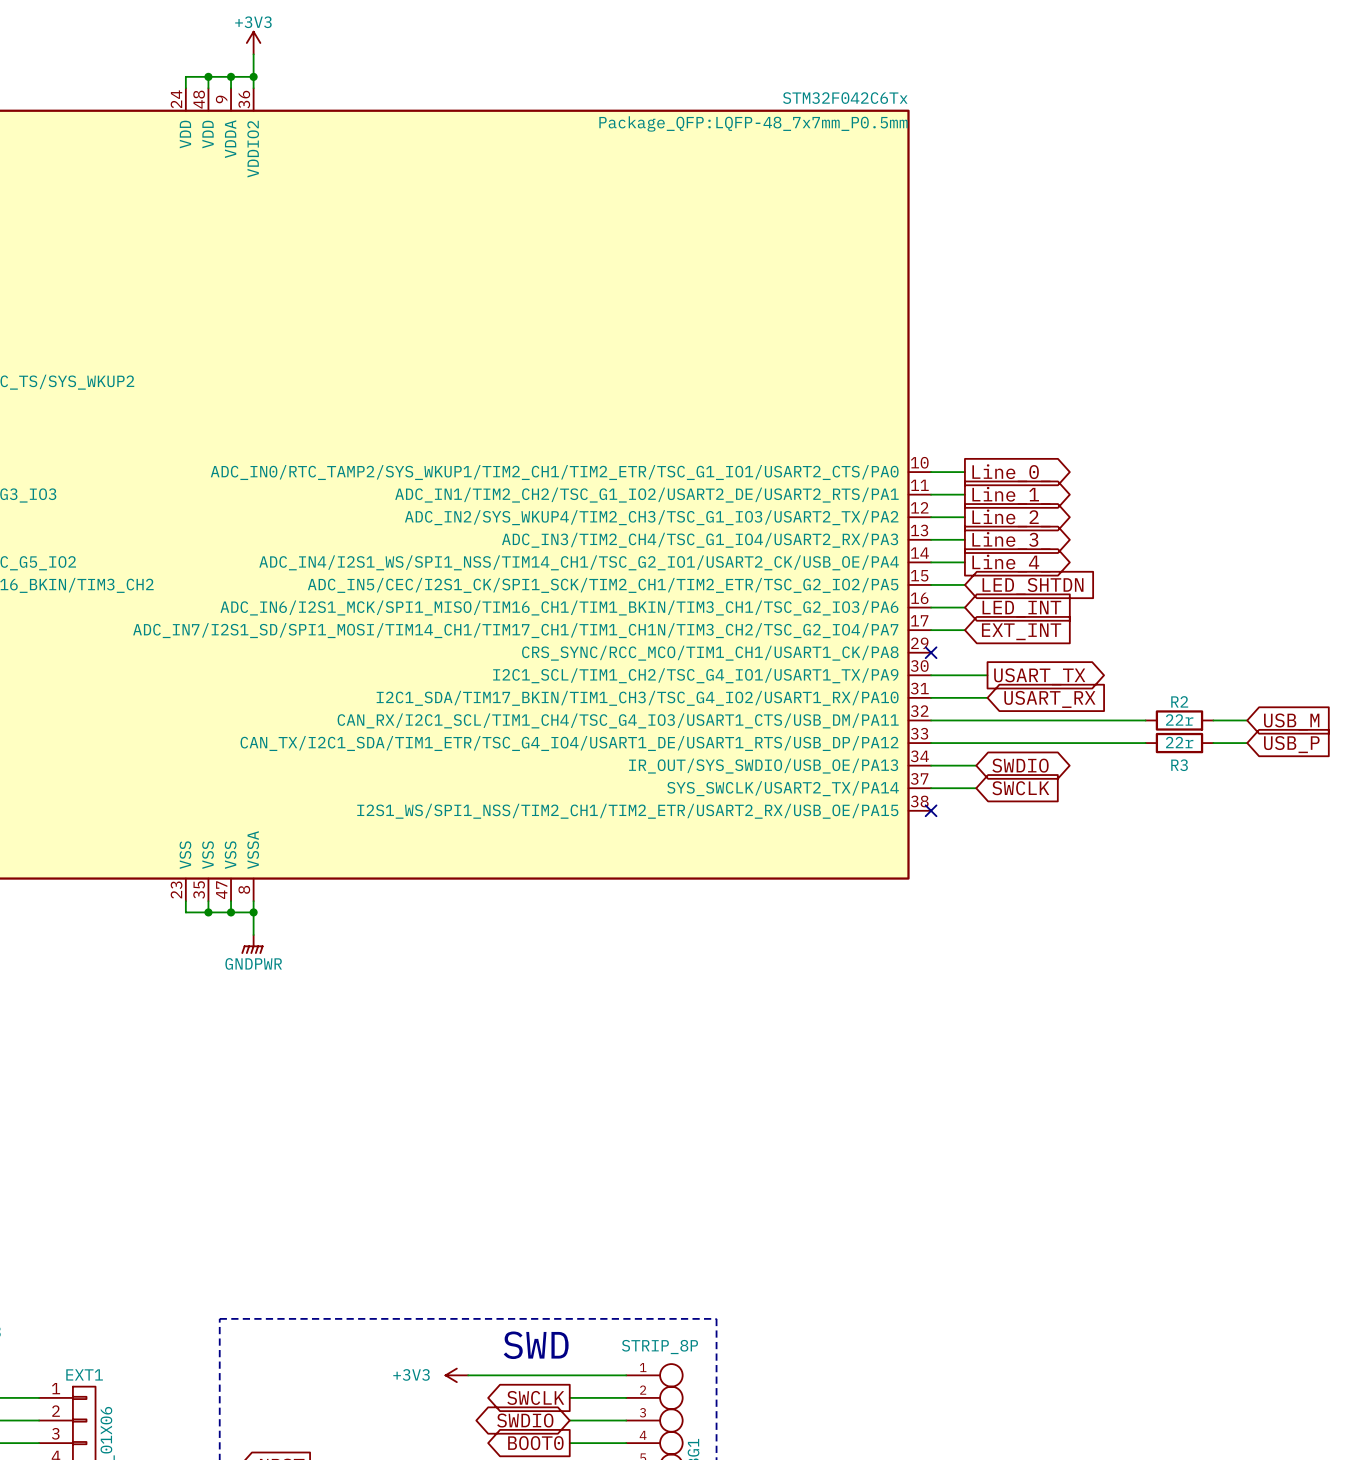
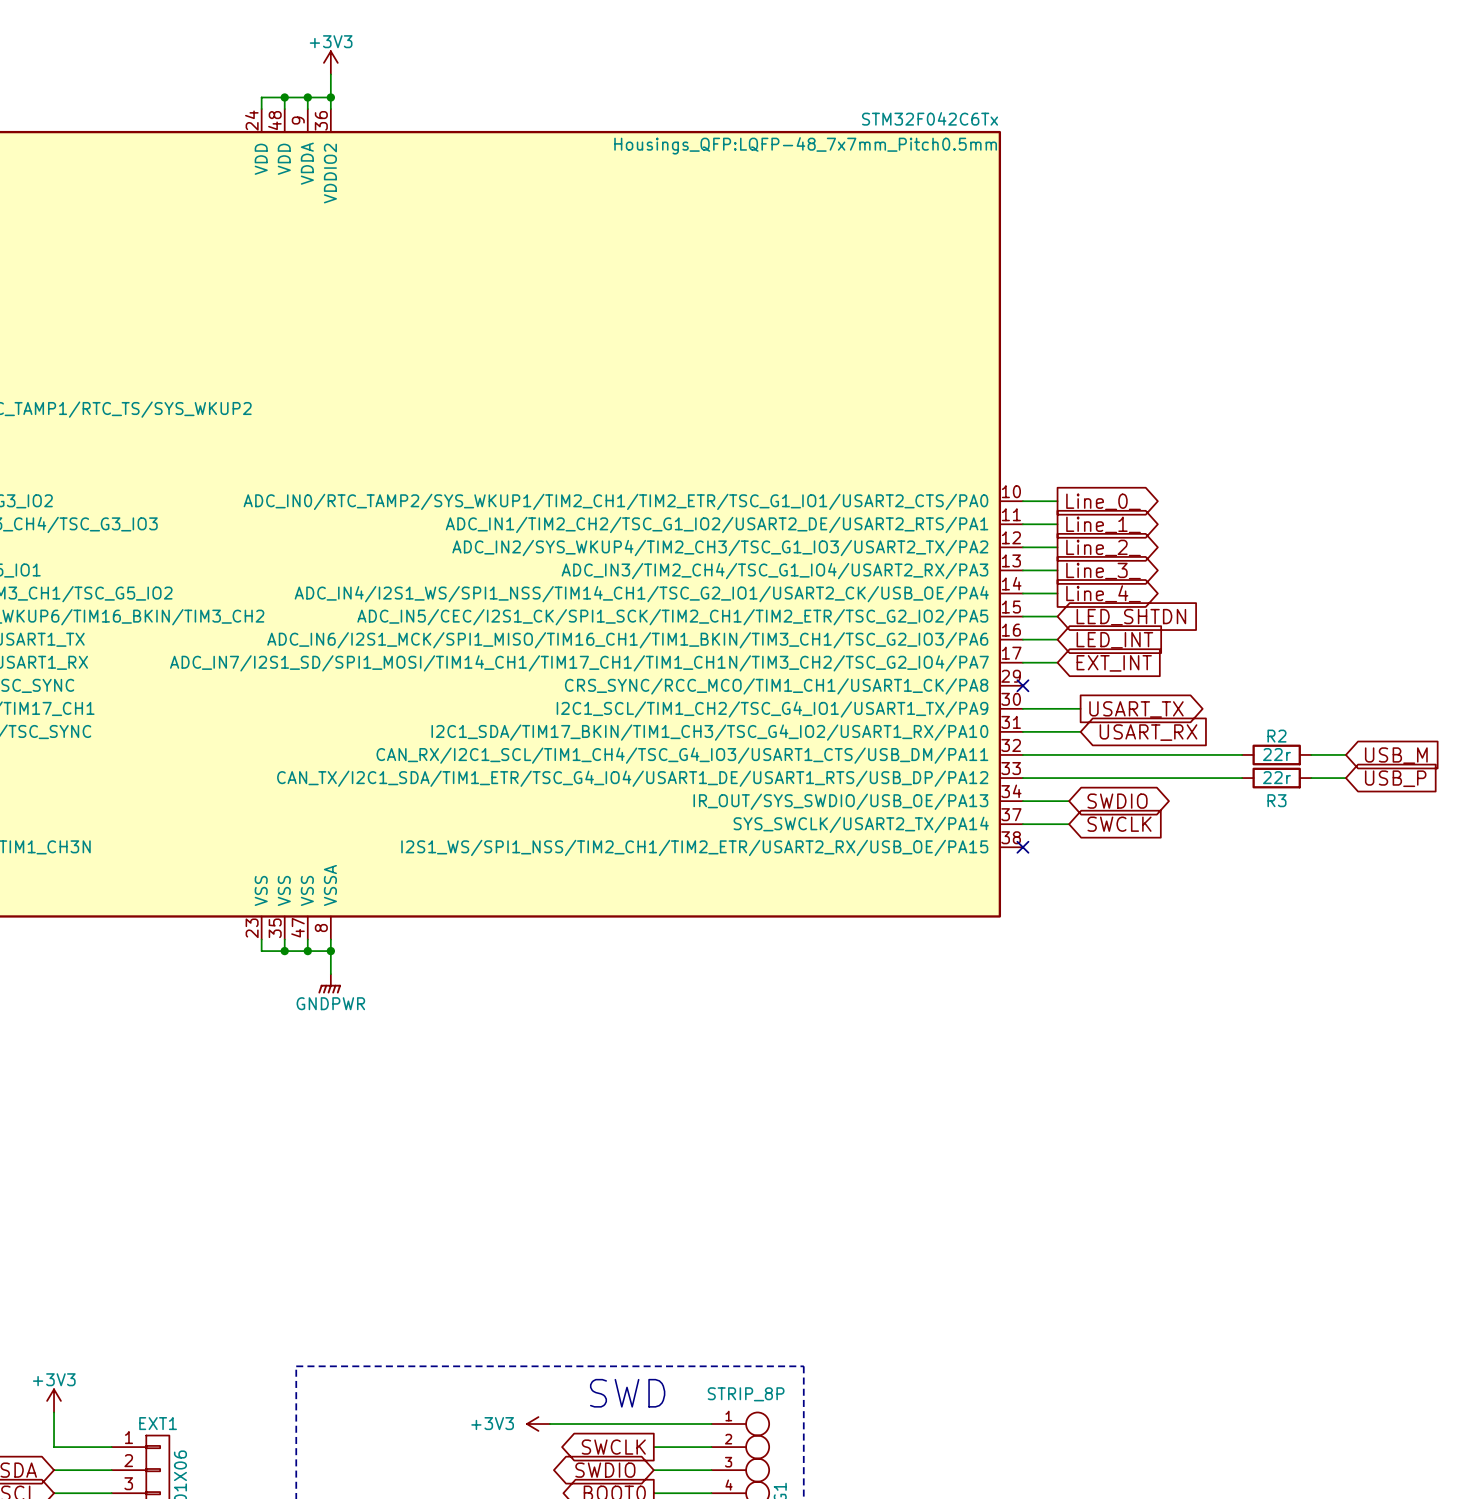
part text: Package_QFP:LQFP-48_7x7mm_P0.5mm (753, 123) -> Housings_QFP:LQFP-48_7x7mm_Pitch0.5mm (805, 145)

